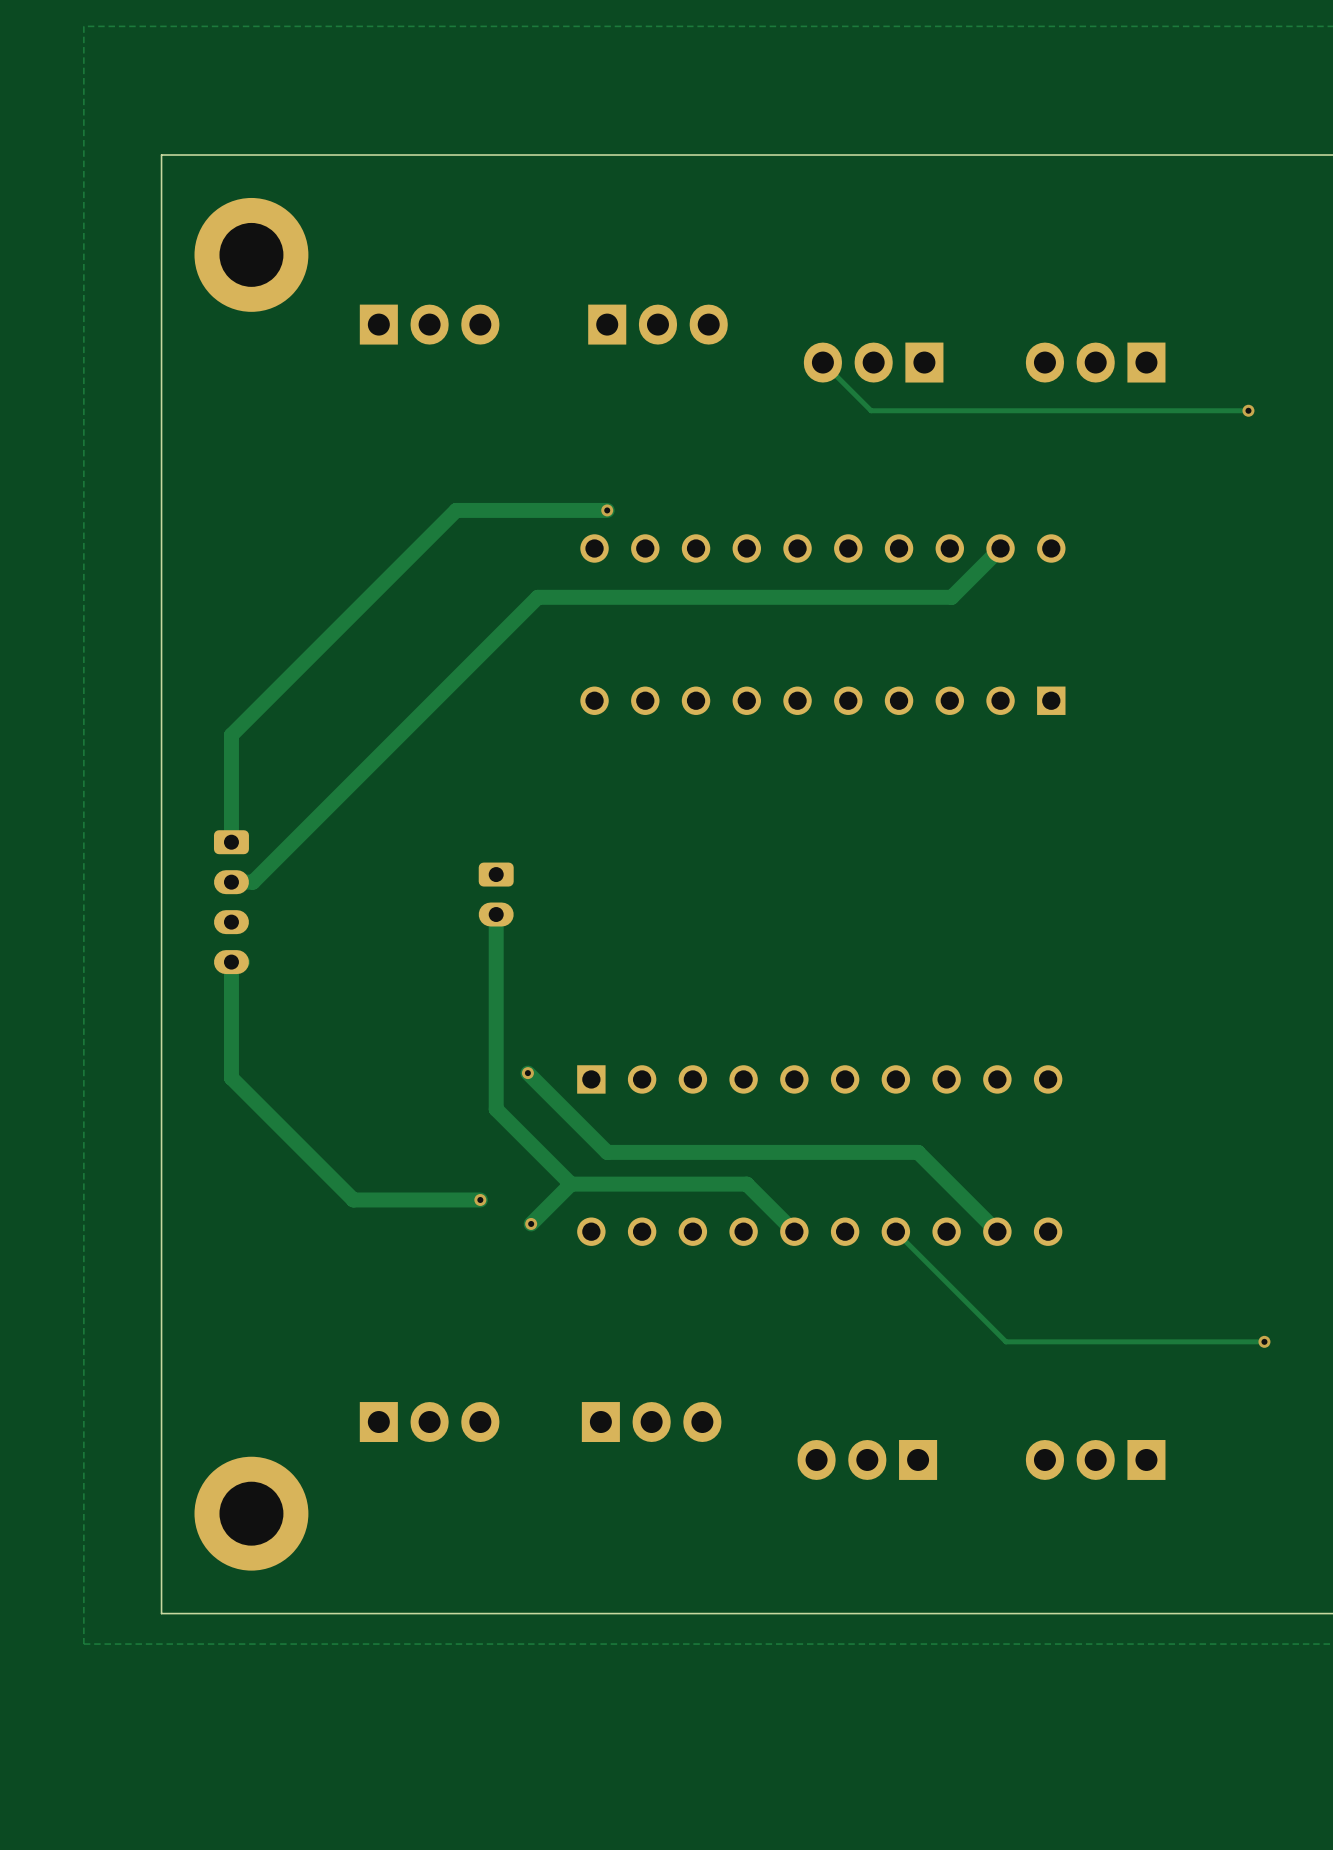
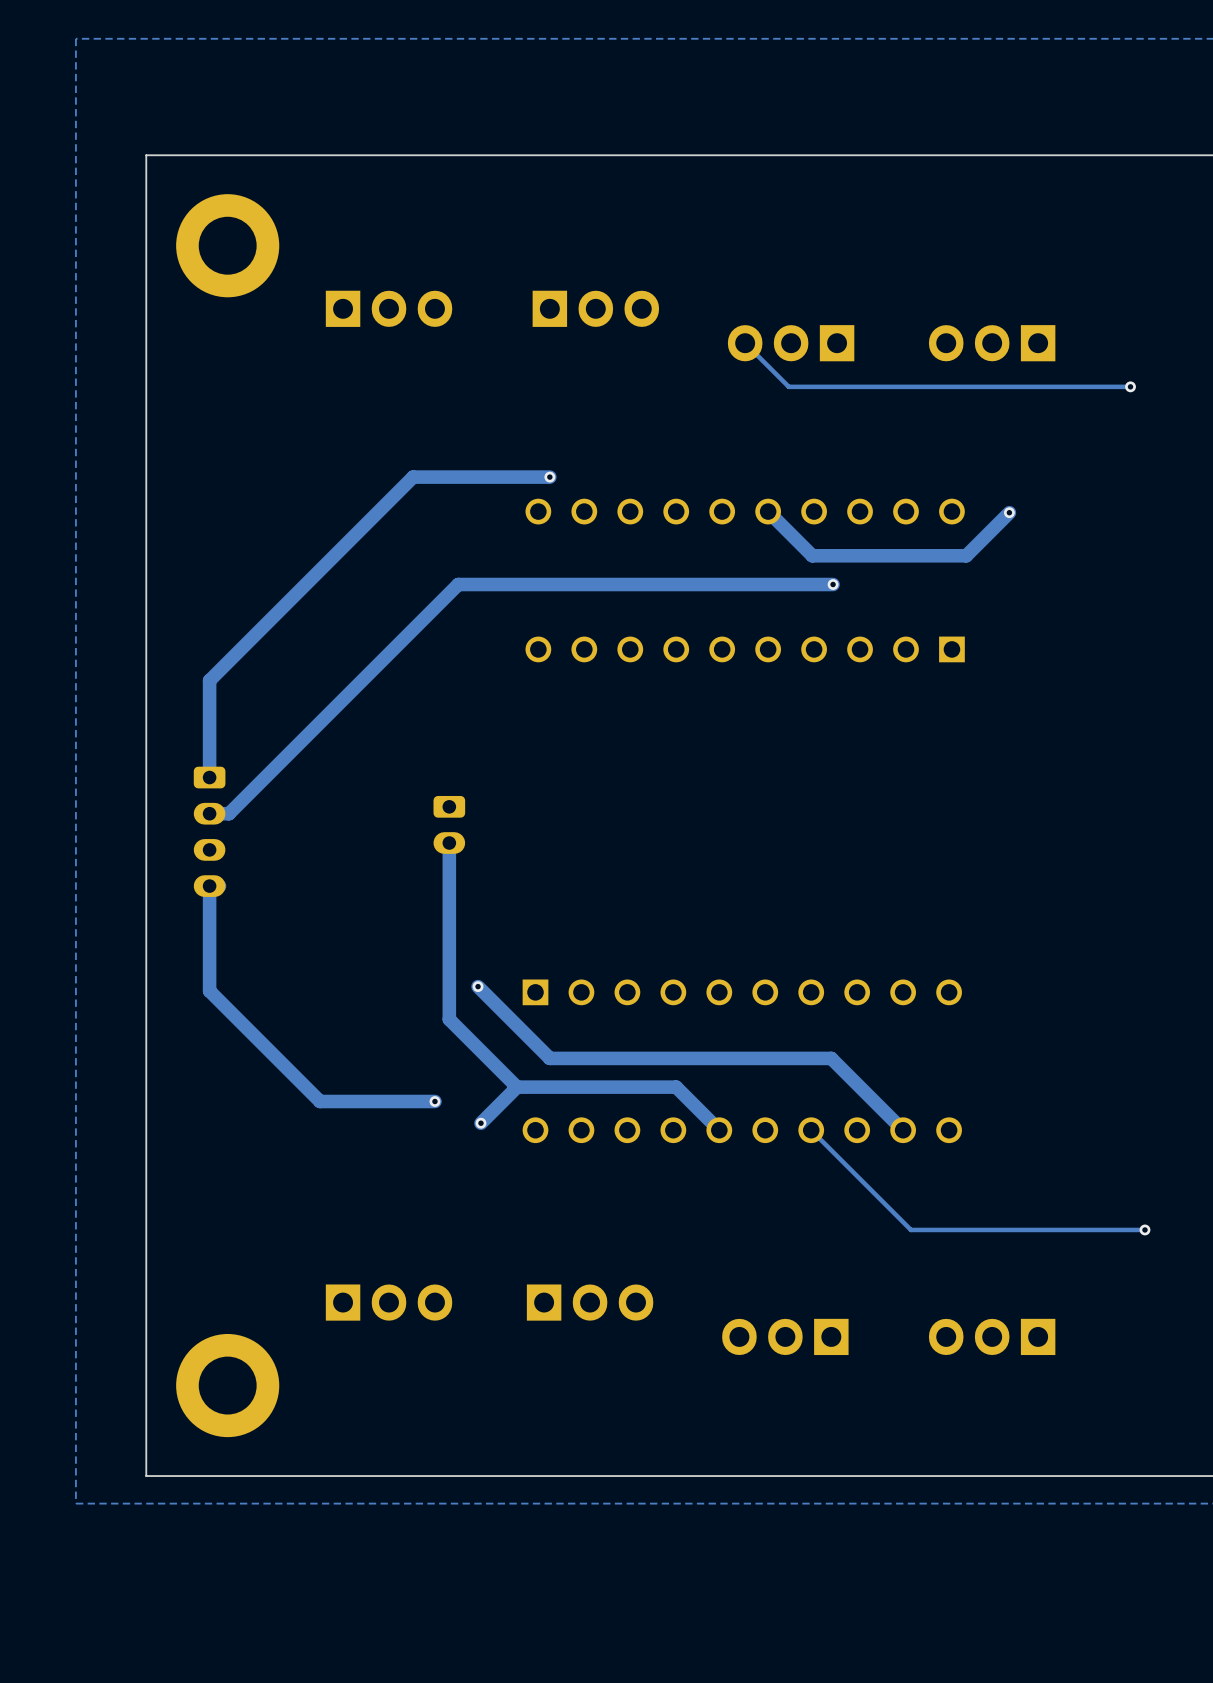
track: none -> (768, 511) (812, 555)
track: (1000, 548) (951, 597) -> (1009, 512) (966, 555) (861, 555)
via: none -> (1009, 512)
track: (897, 597) (537, 597) (506, 629) -> (833, 584) (458, 584)
via: none -> (833, 584)

